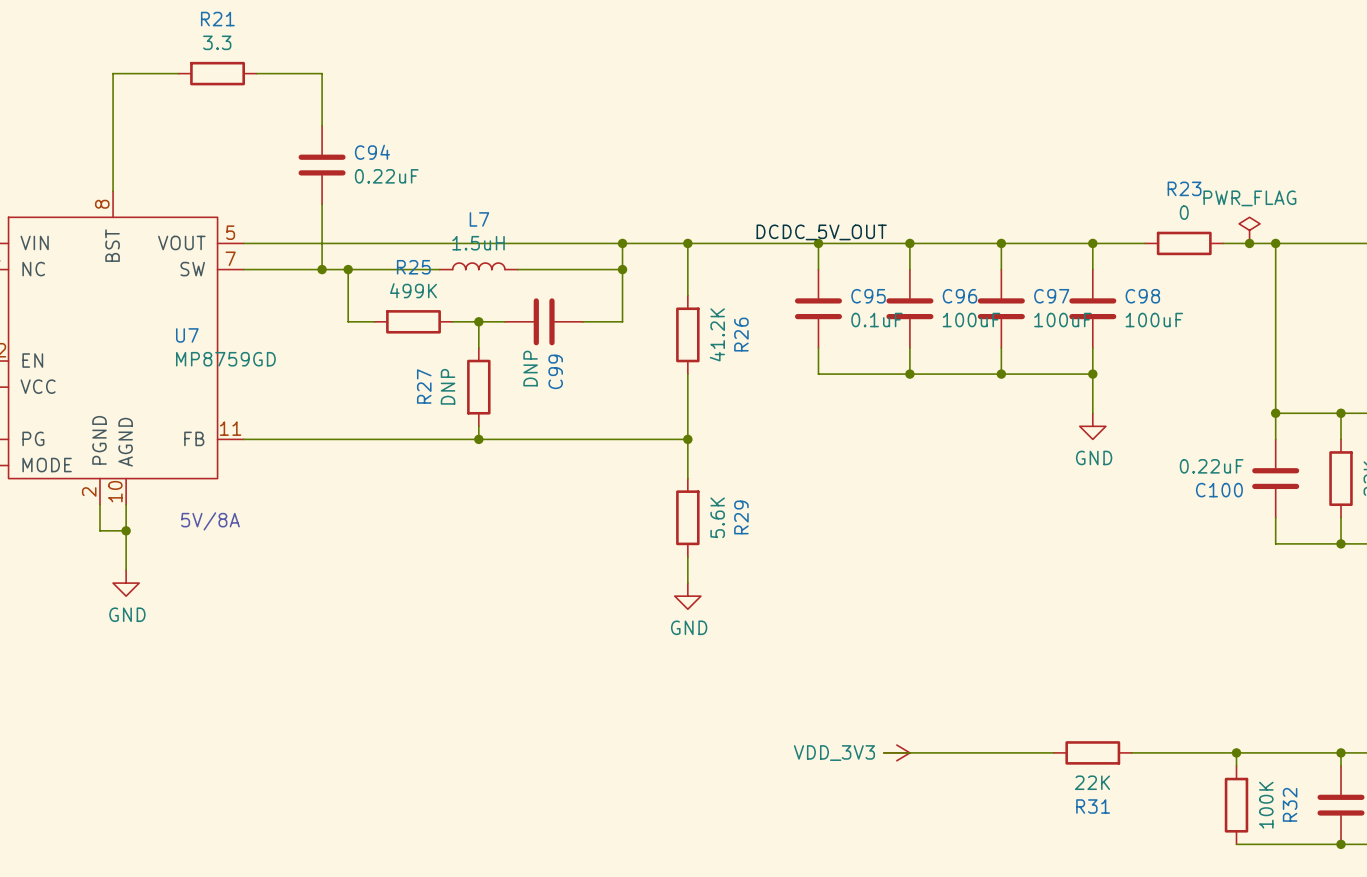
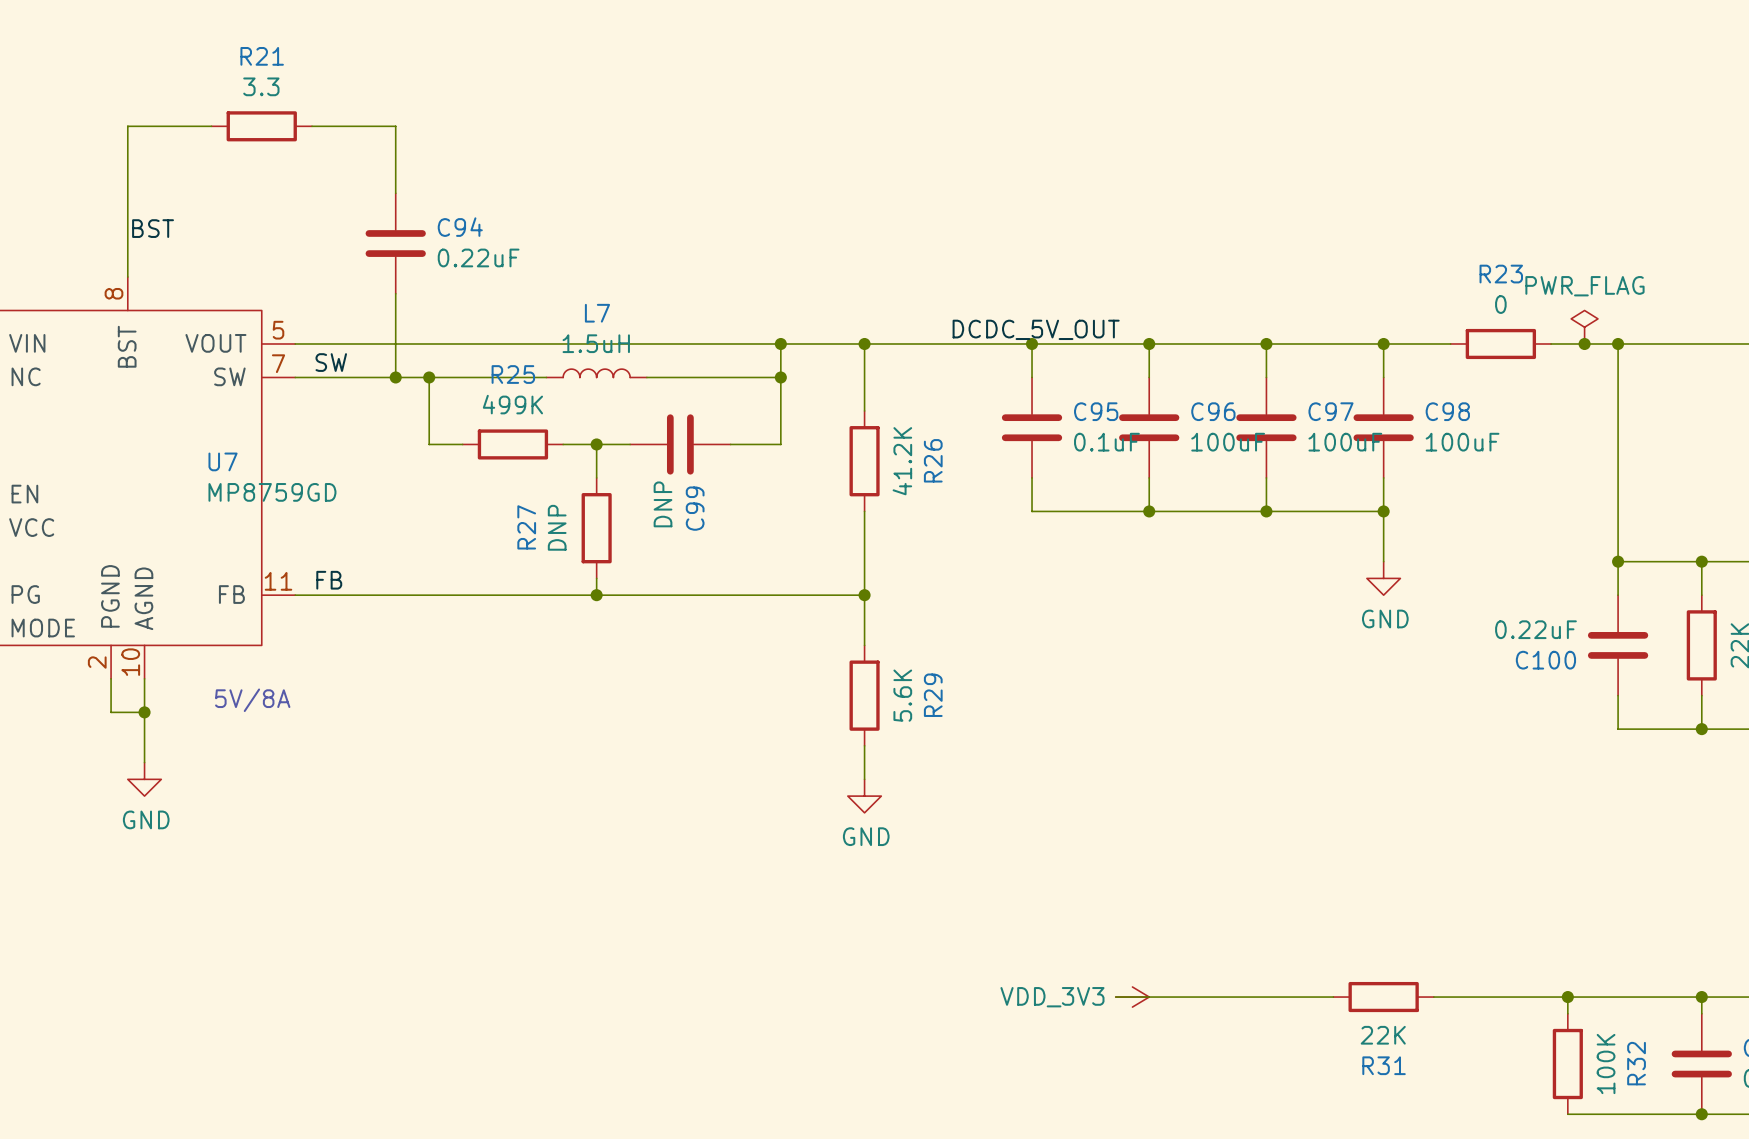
label: none -> BST (153, 228)
label: none -> SW (331, 362)
label: none -> FB (329, 580)

